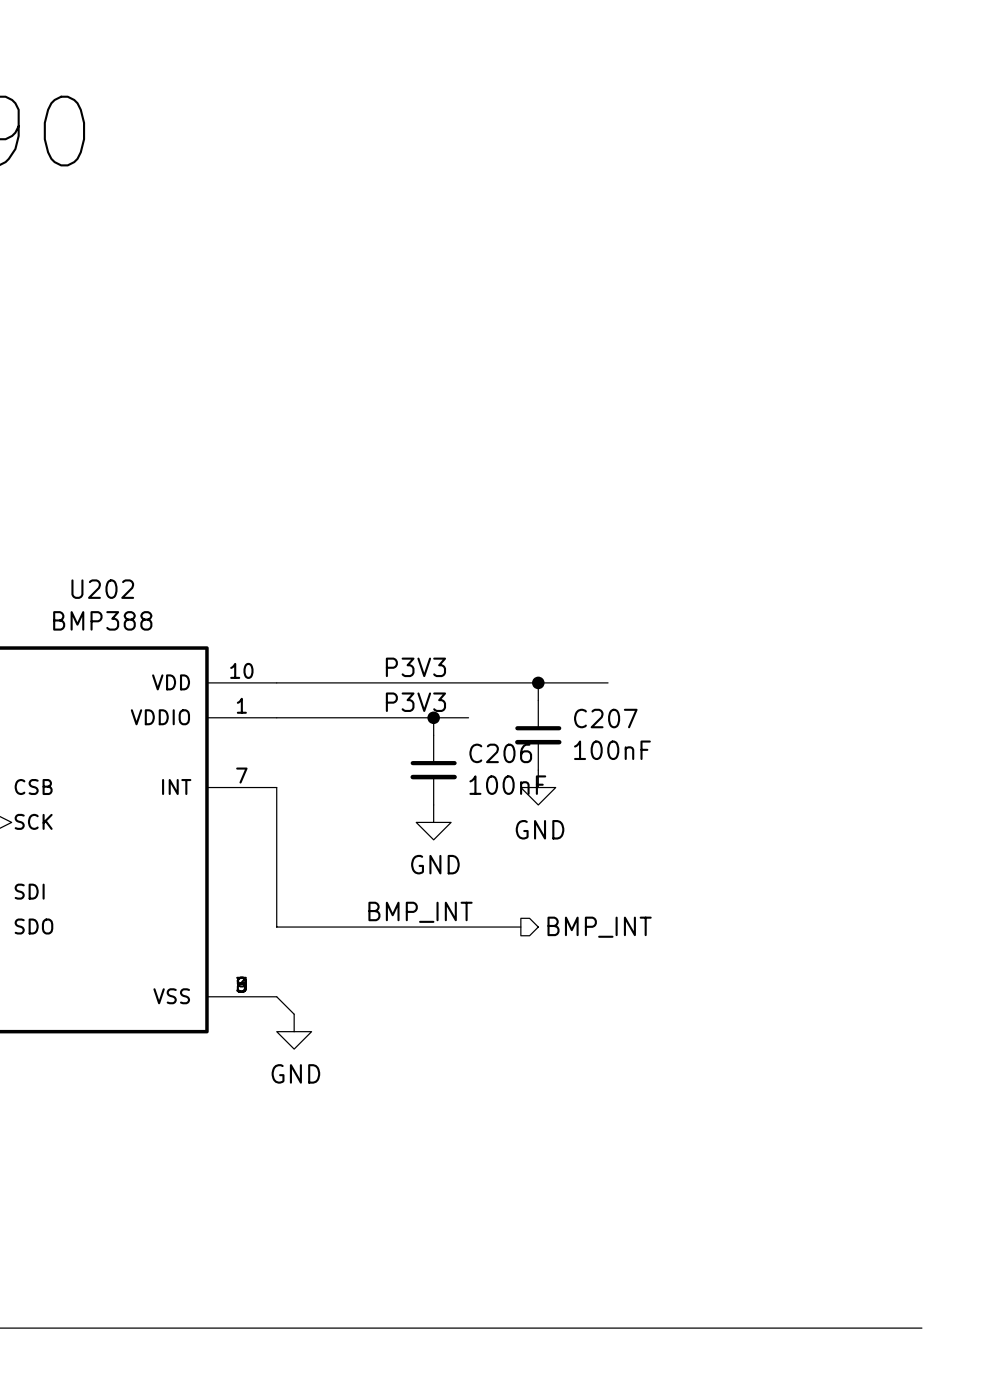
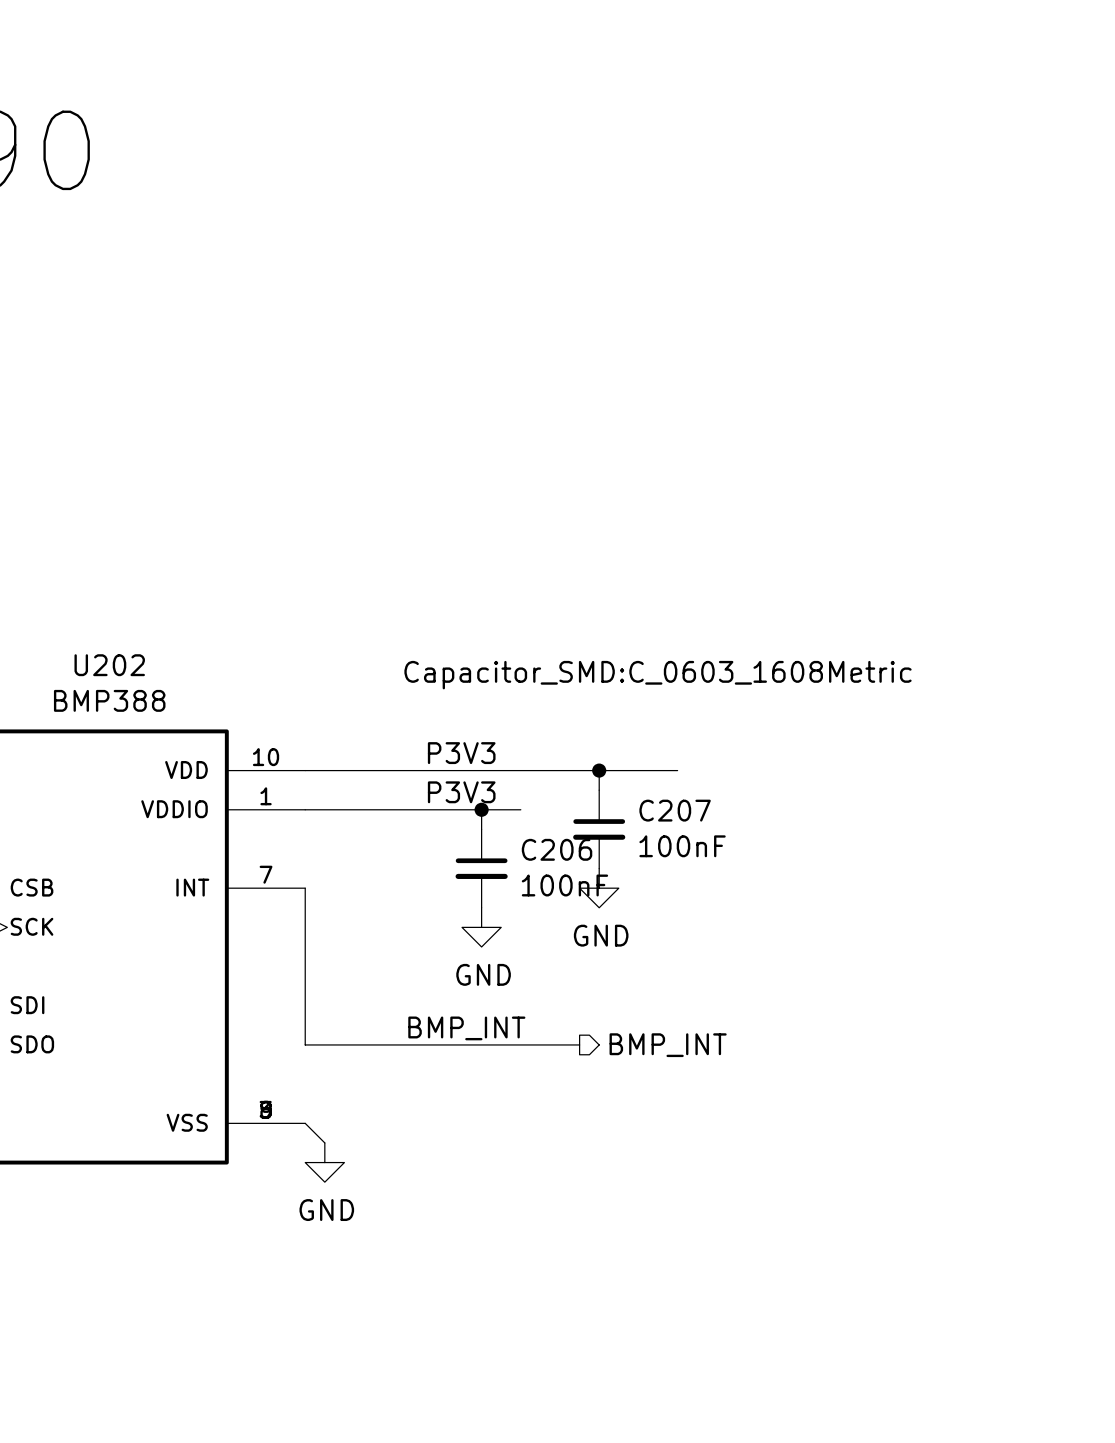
C207 text: none -> Capacitor_SMD:C_0603_1608Metric (658, 675)

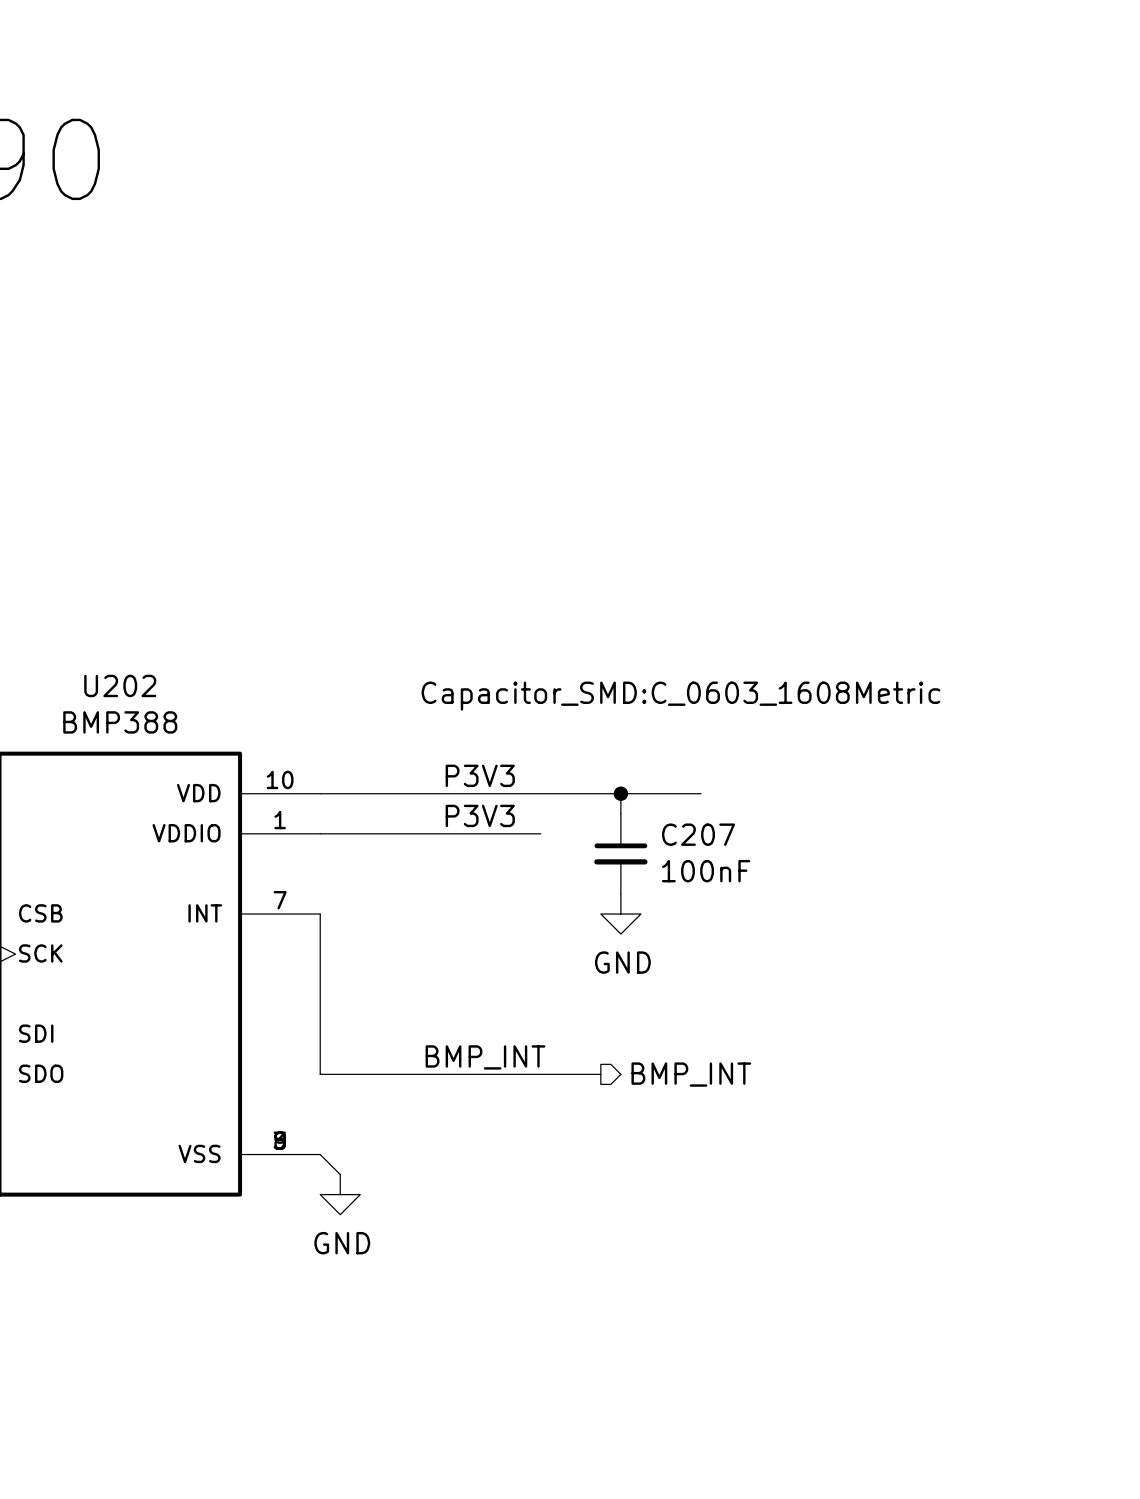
wire: (481, 809) (481, 829) -> none
junction: (481, 809) -> none
C206: 100nF (481, 868) -> none
power symbol: GND (481, 927) -> none

